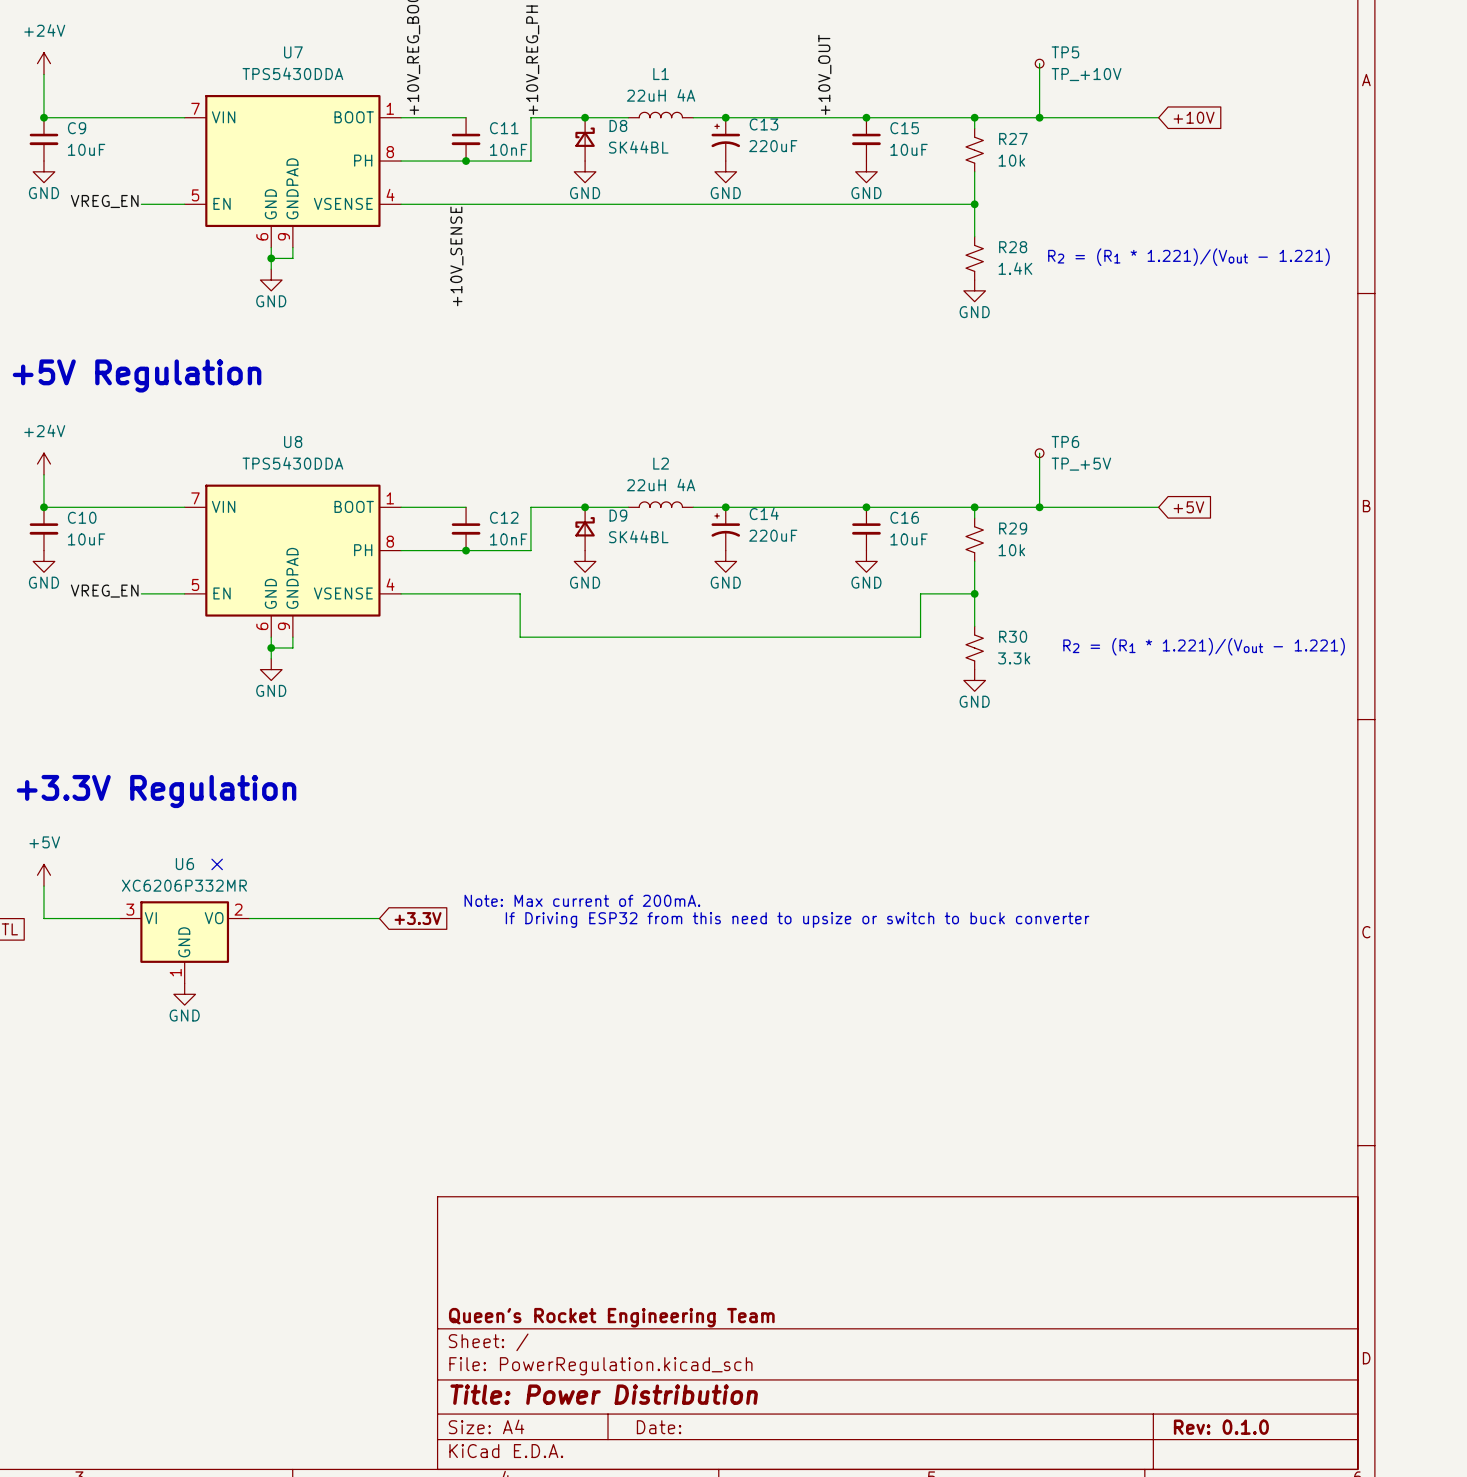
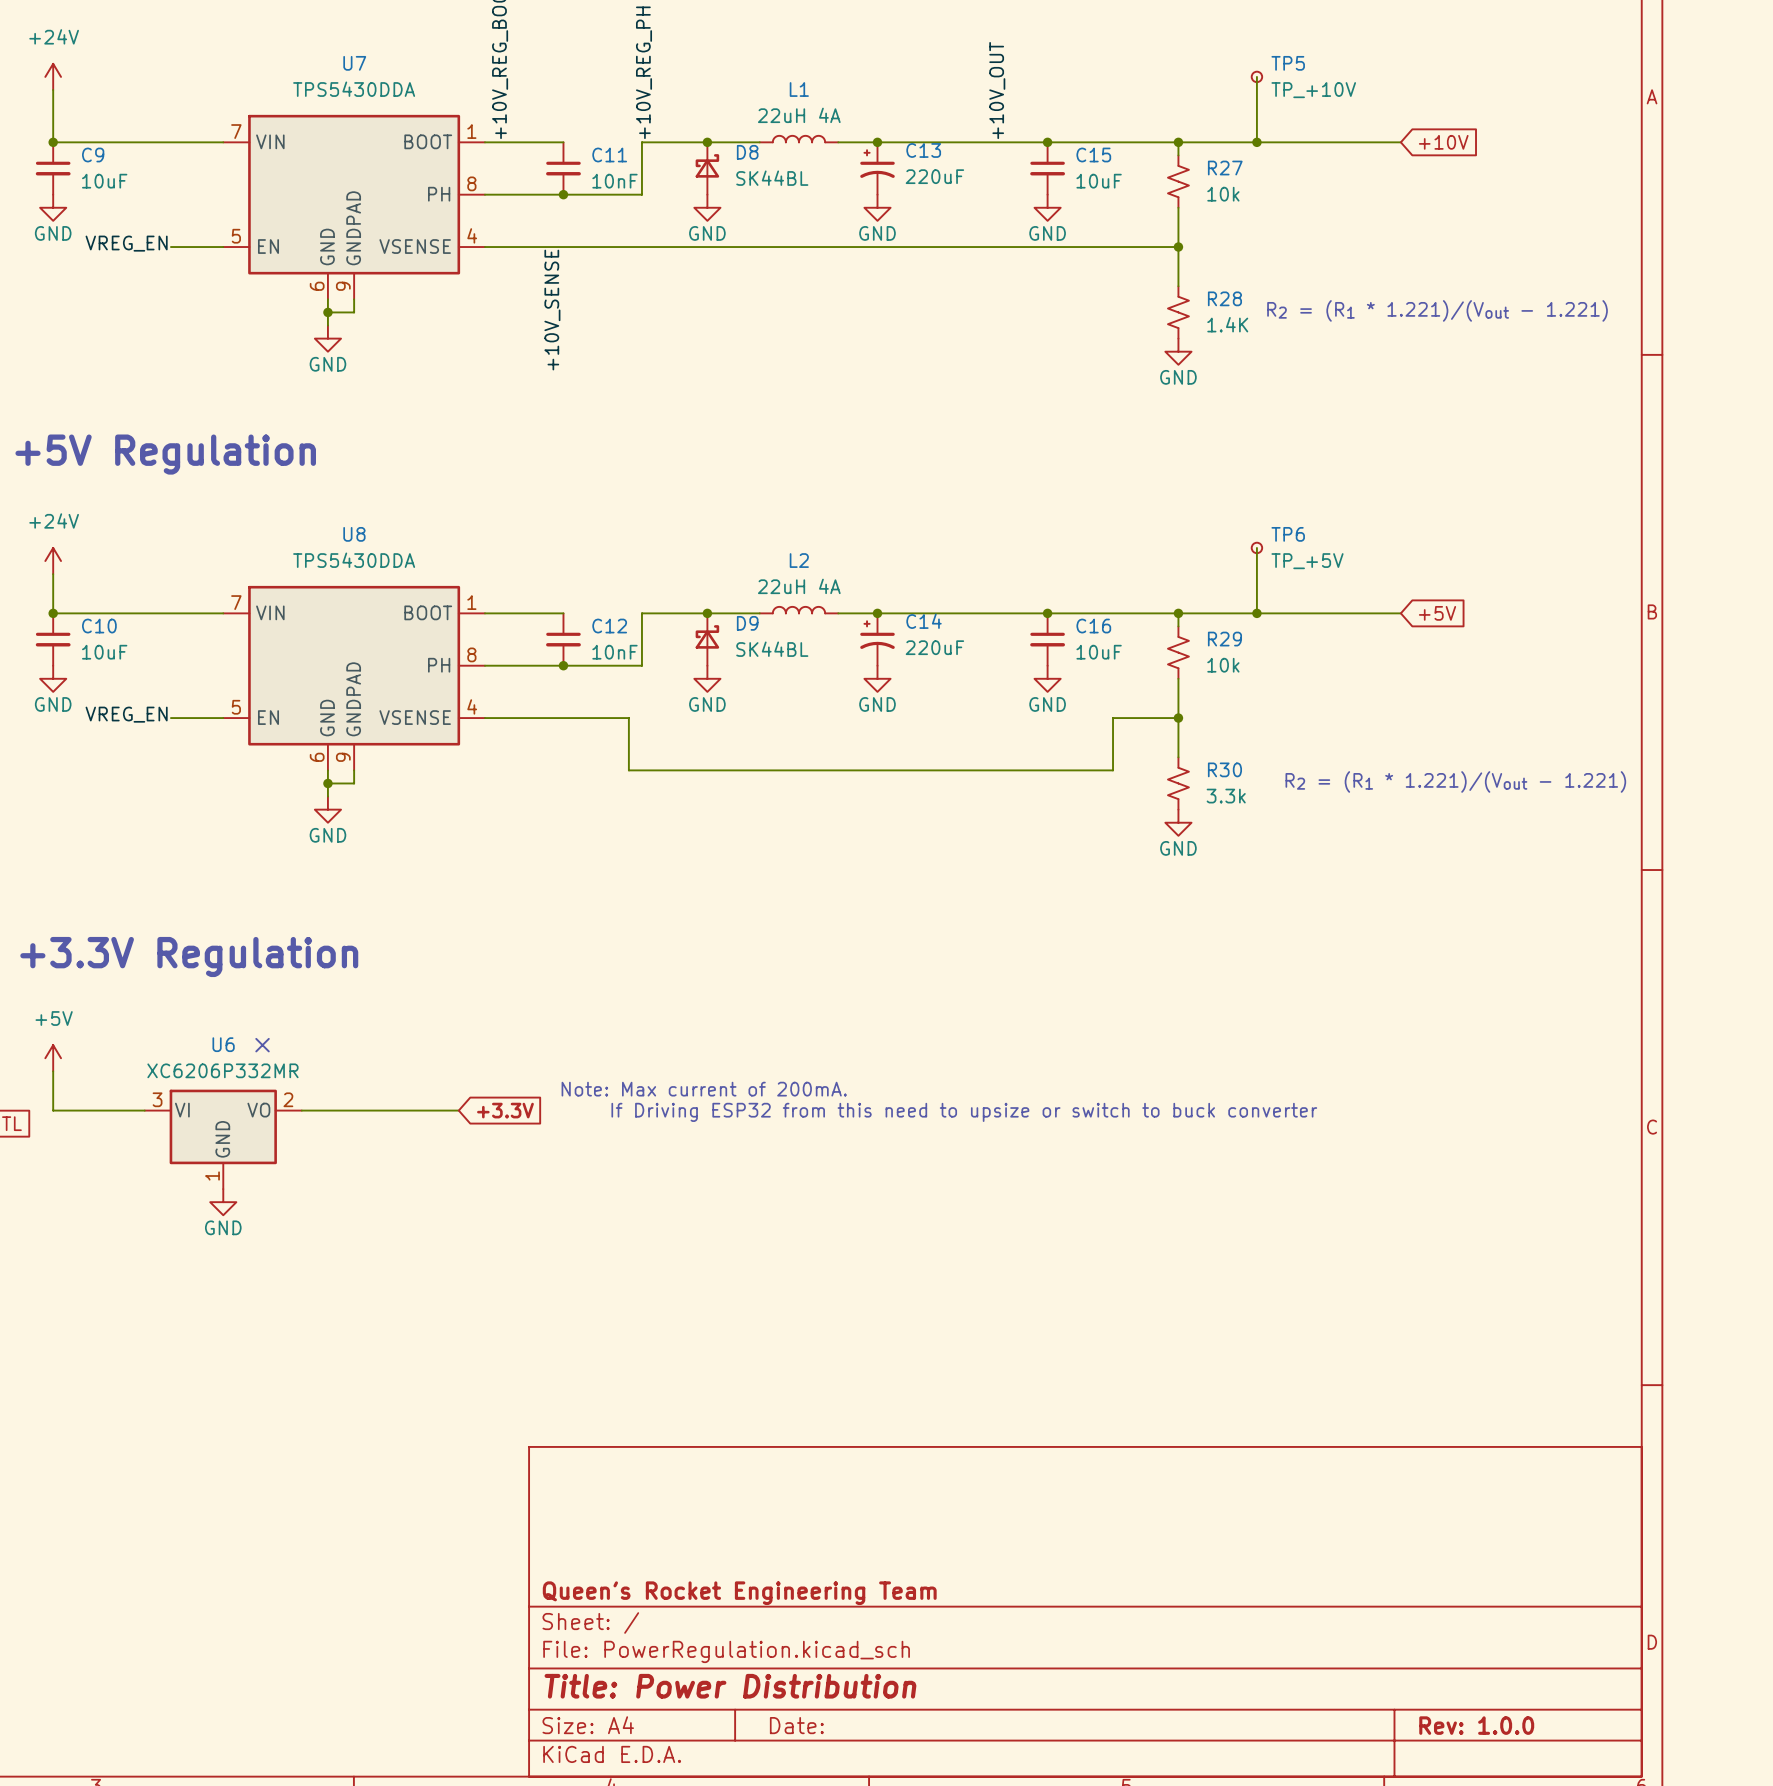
title block: Rev: 0.1.0 (1221, 1427) -> Rev: 1.0.0 (1476, 1725)

